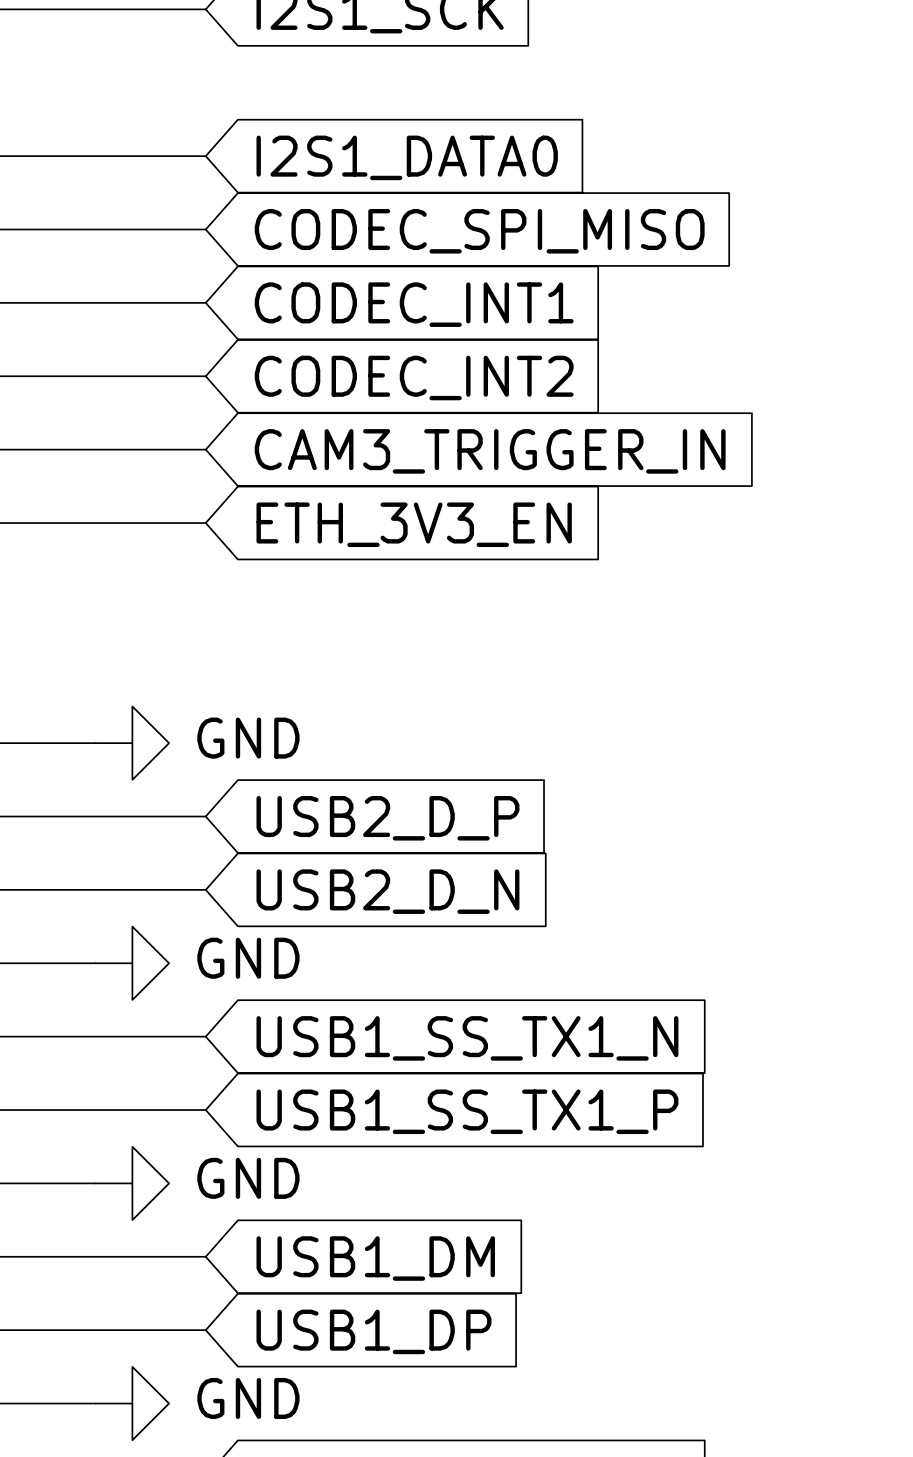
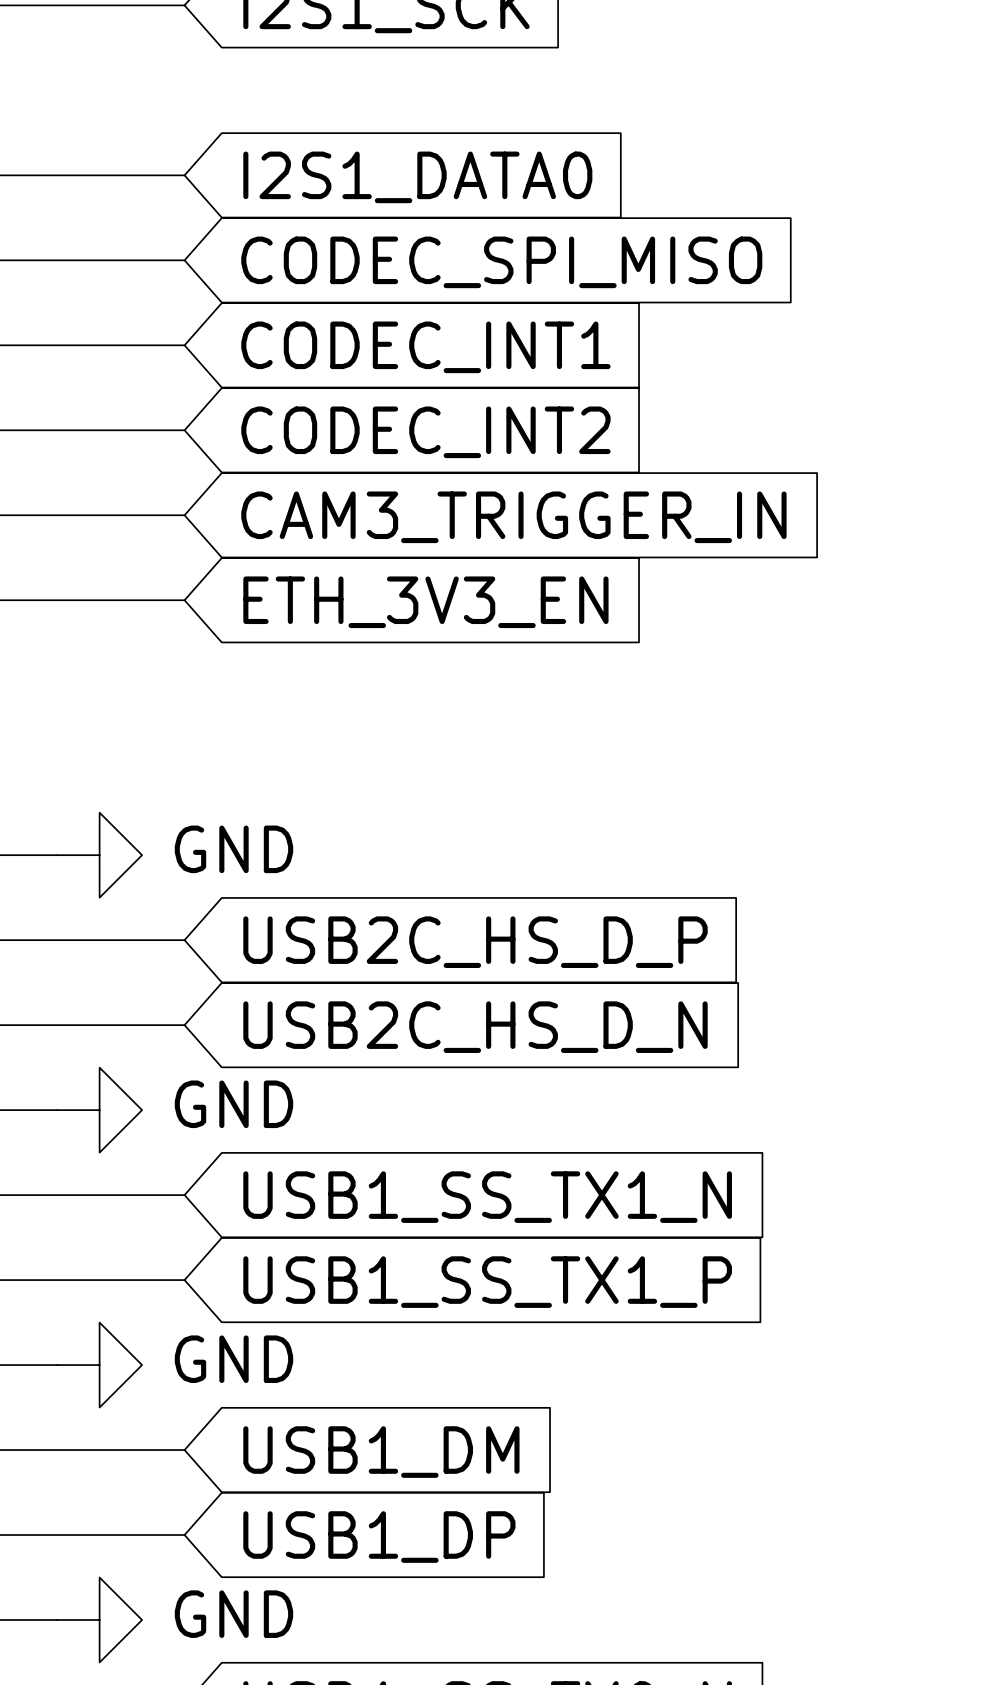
global label: USB2_D_P (387, 818) -> USB2C_HS_D_P (475, 942)
global label: USB2_D_N (387, 891) -> USB2C_HS_D_N (475, 1027)

